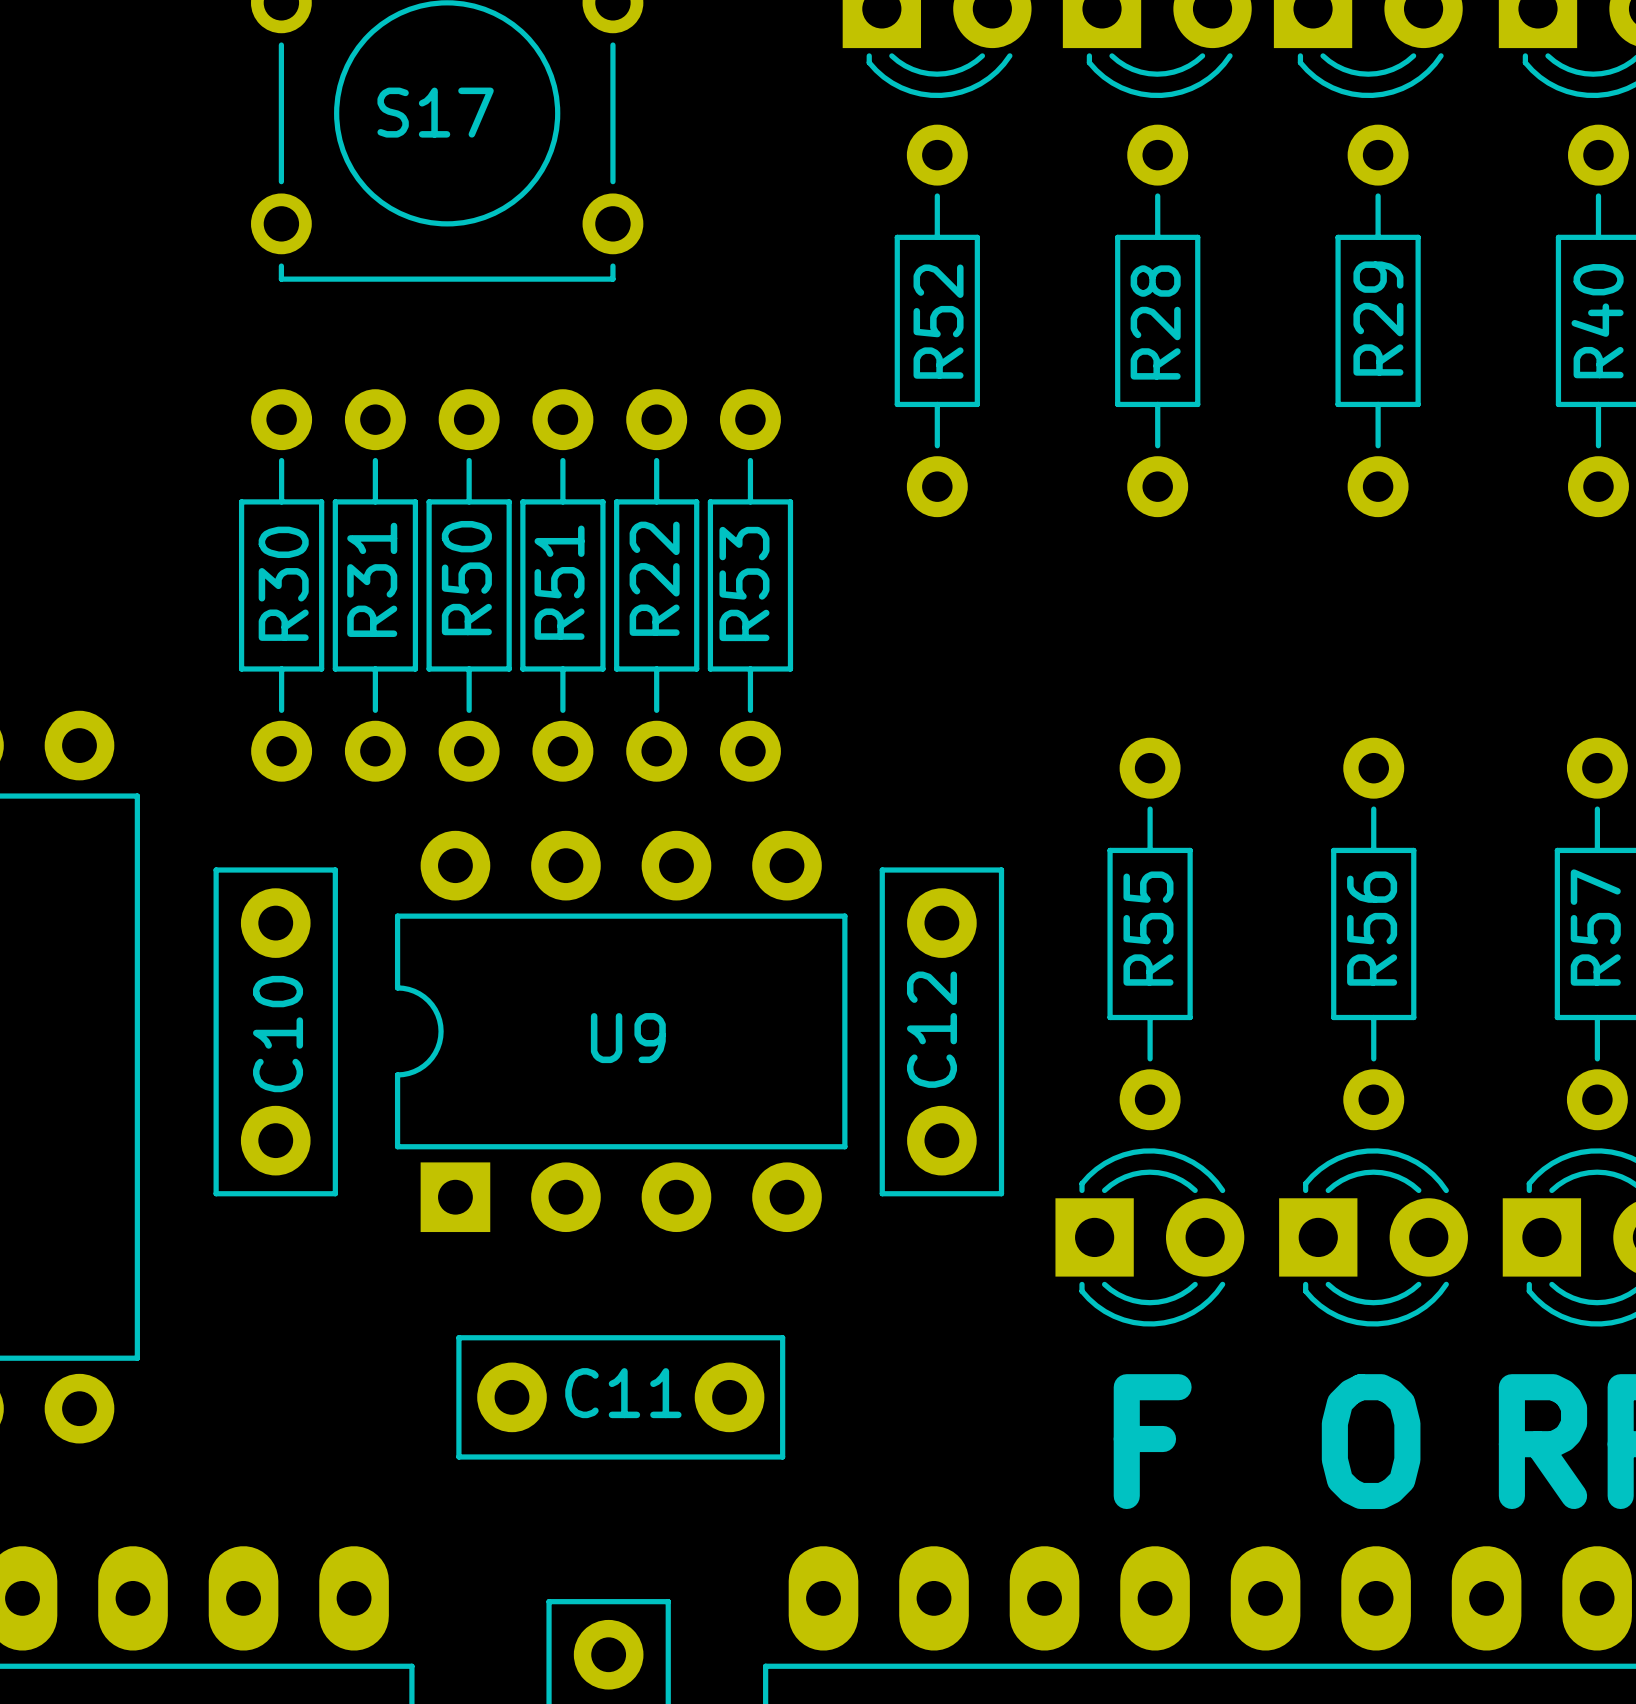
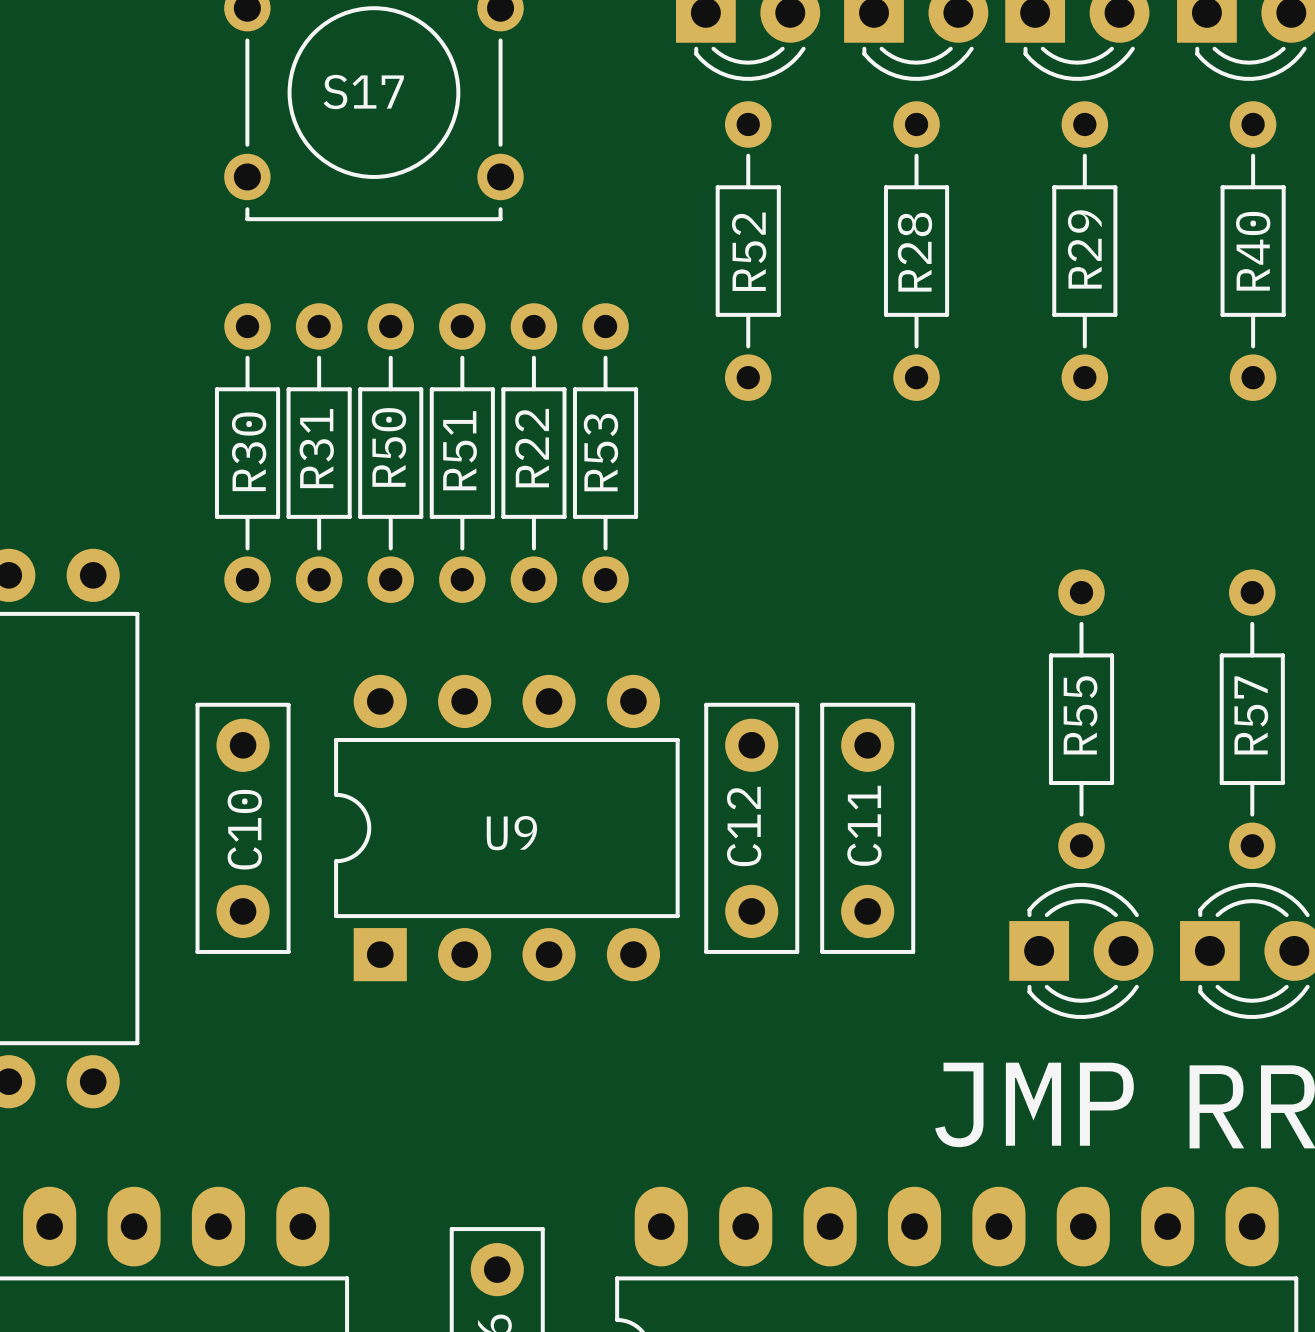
R56 name: R56 (1372, 928) -> R55 (1080, 715)
R55: (1150, 933) -> none
C10 position: (275, 1031) -> (243, 828)
U9 position: (621, 1031) -> (506, 828)
C12 position: (941, 1031) -> (751, 828)
part: (1149, 1237) -> none
C11 rotation: 0° (620, 1397) -> 90° clockwise (867, 828)
C11 position: (620, 1397) -> (867, 828)
text: none -> JMP (1034, 1104)
text: F (1152, 1441) -> none
text: O (1371, 1441) -> none

